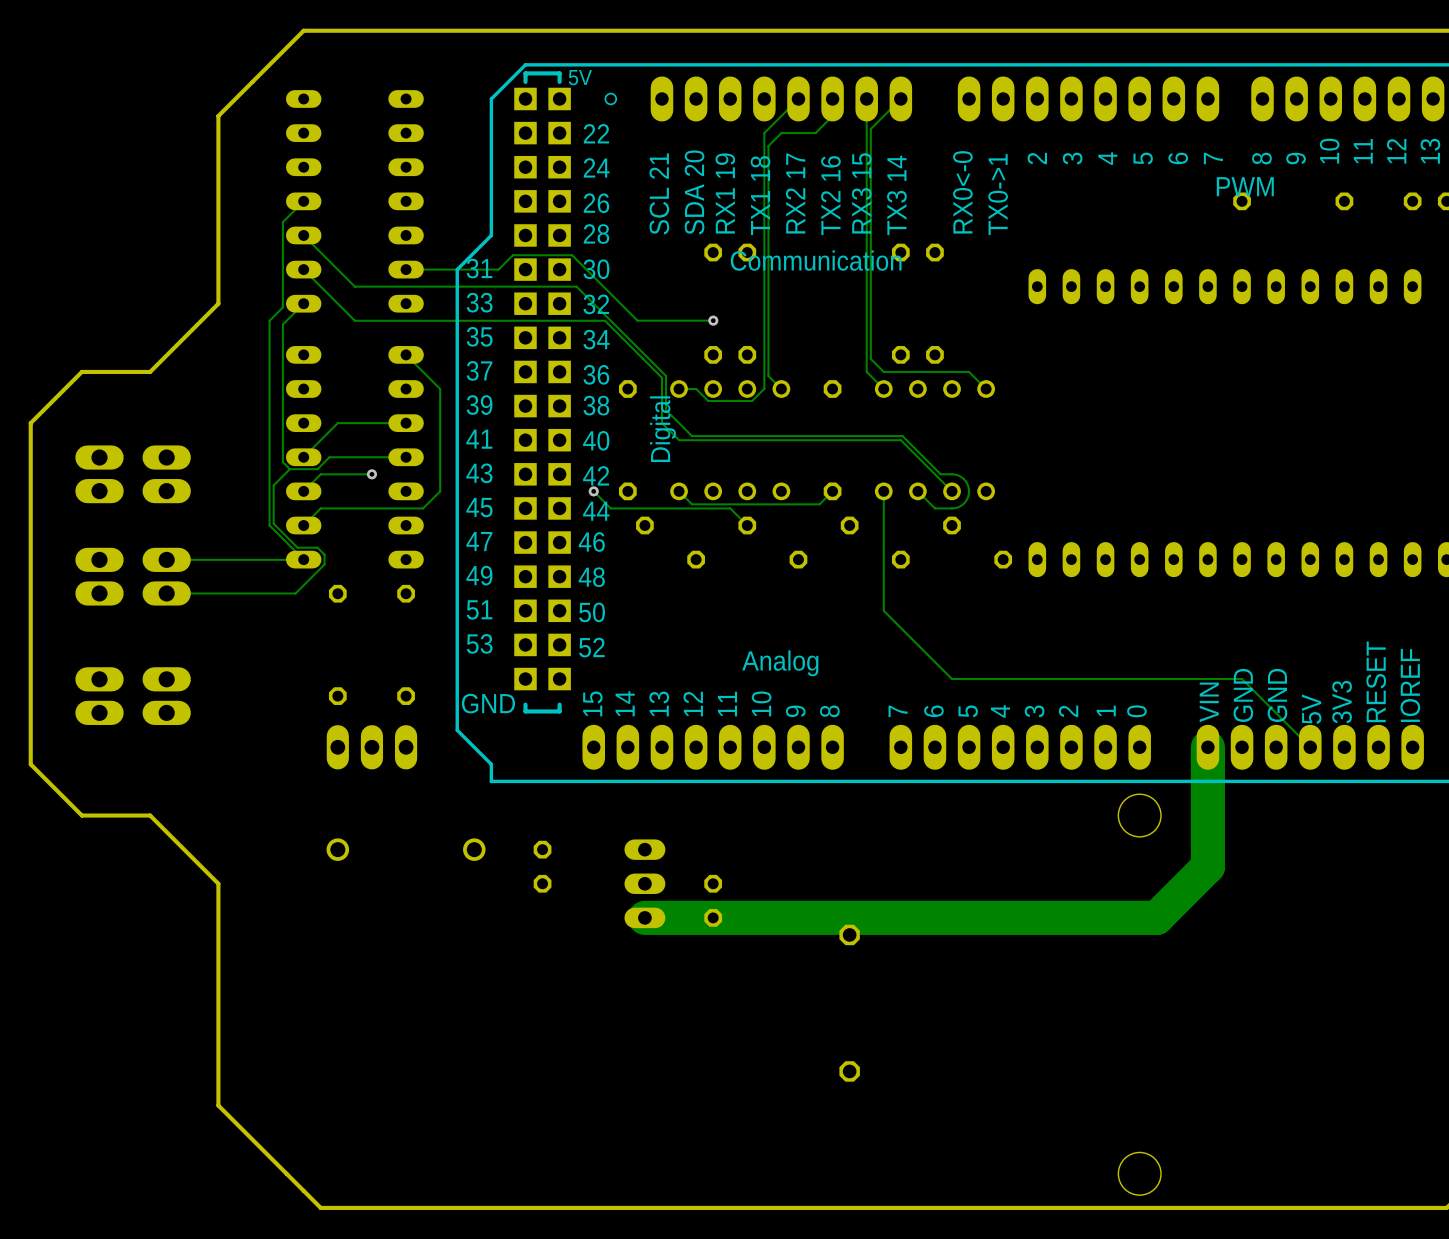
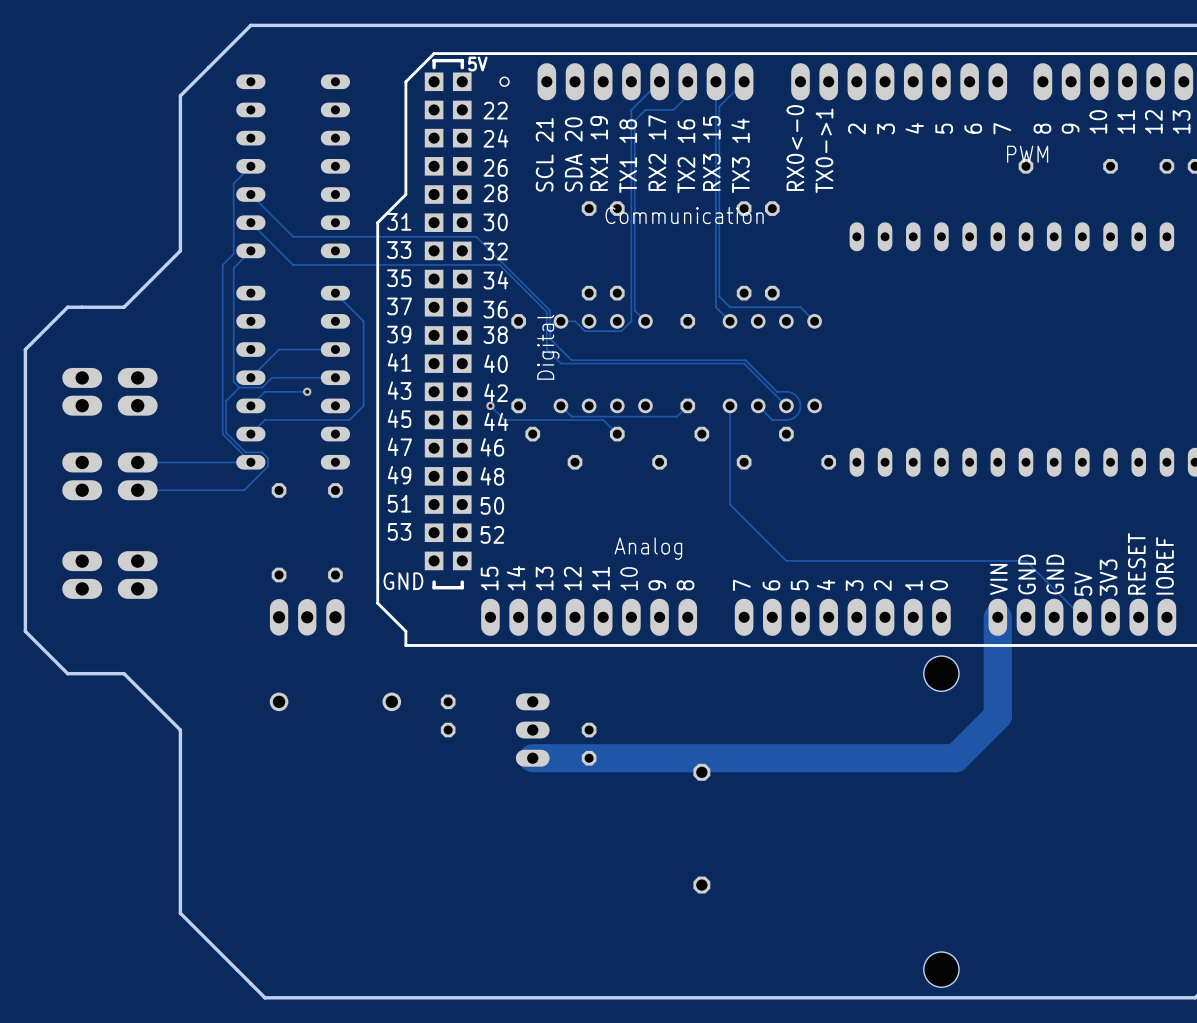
track: (406, 269) (498, 269) (512, 255) (572, 255) (637, 320) (713, 320) -> none
via: (713, 320) -> none

